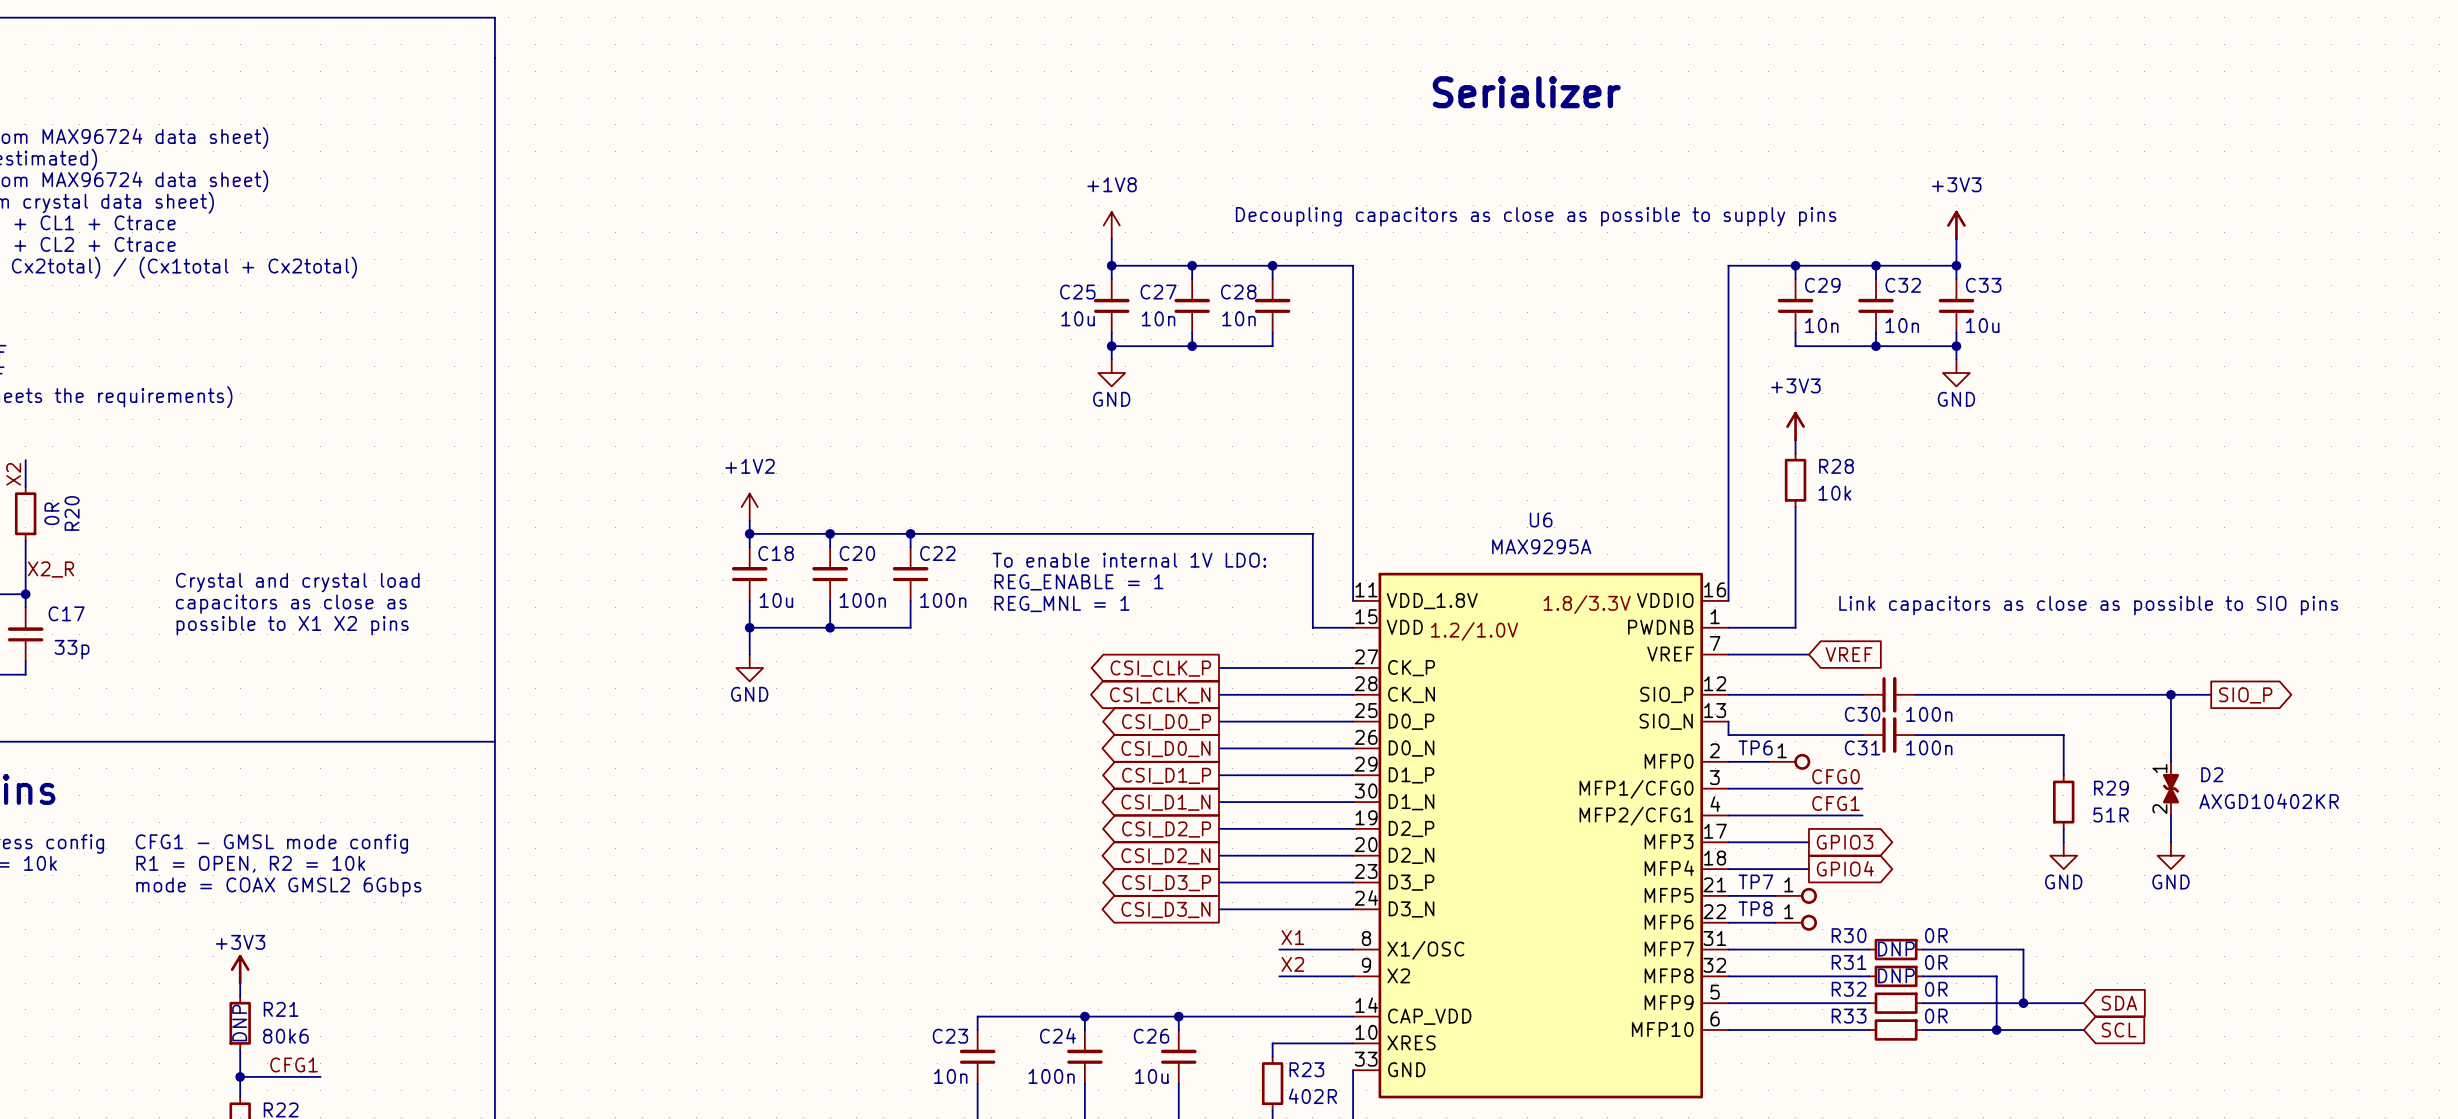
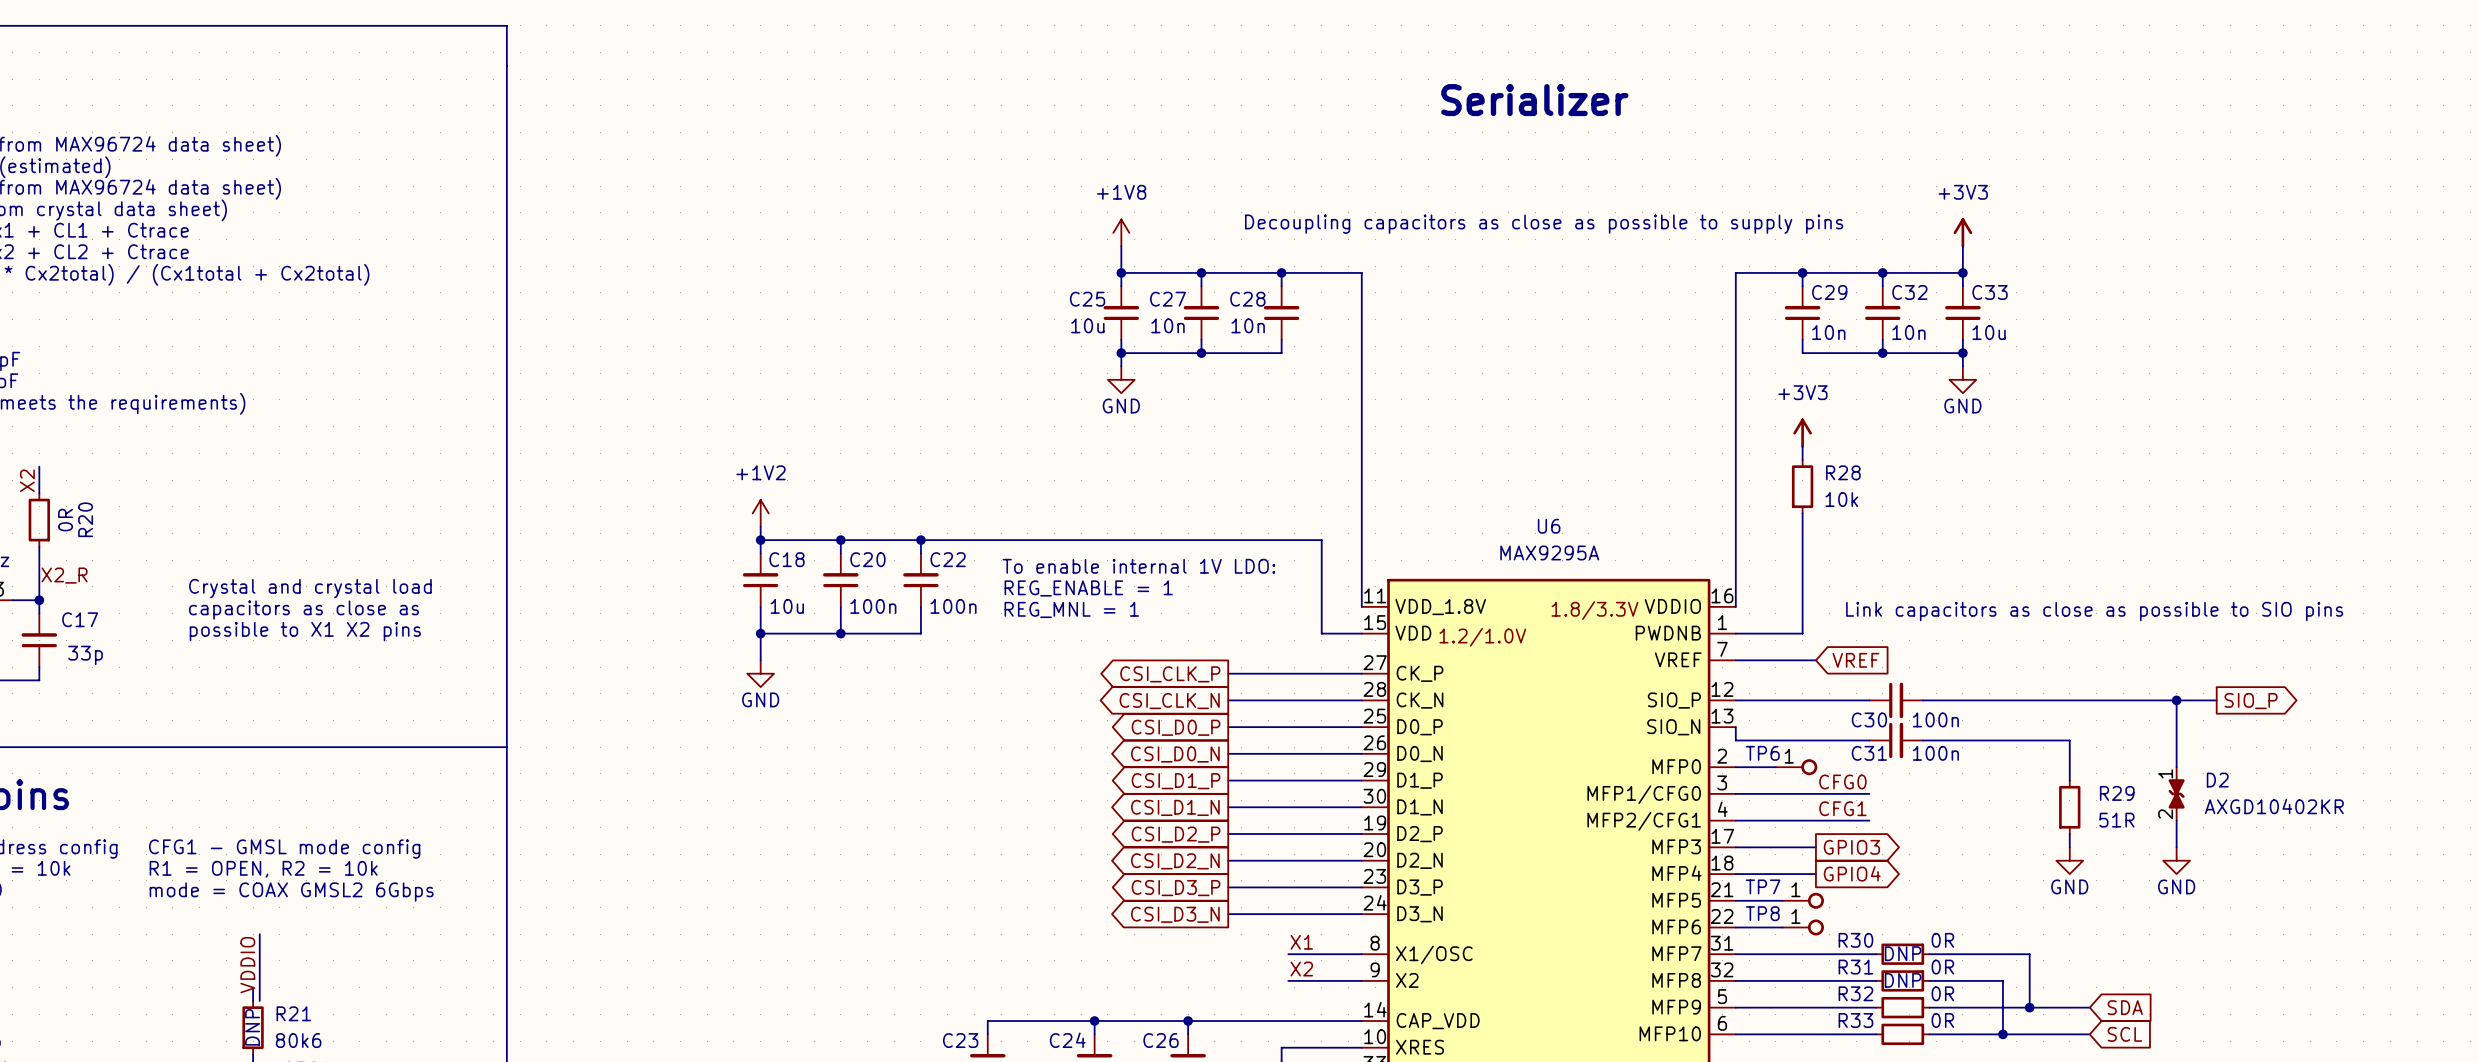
wire: none -> (259, 934) (259, 1000)
label: none -> VDDIO (247, 965)
power symbol: +3V3 (240, 969) -> none

